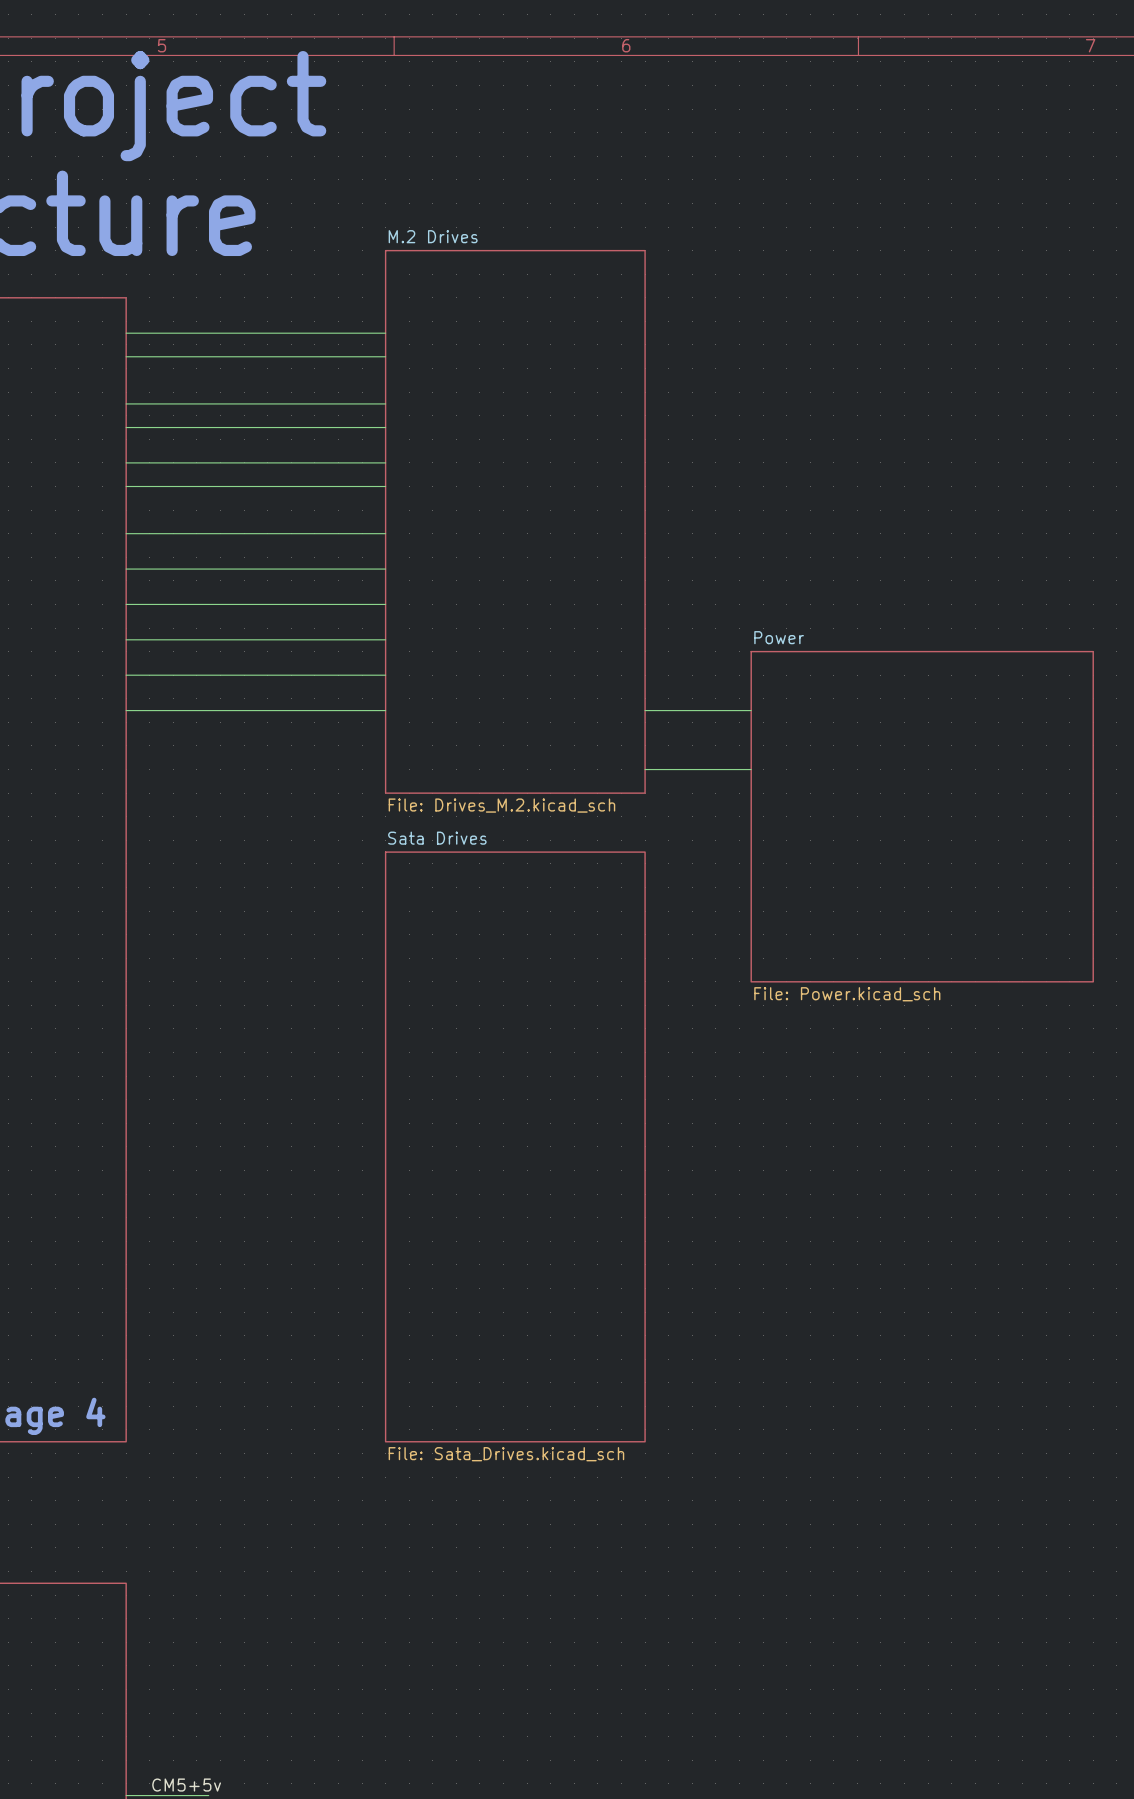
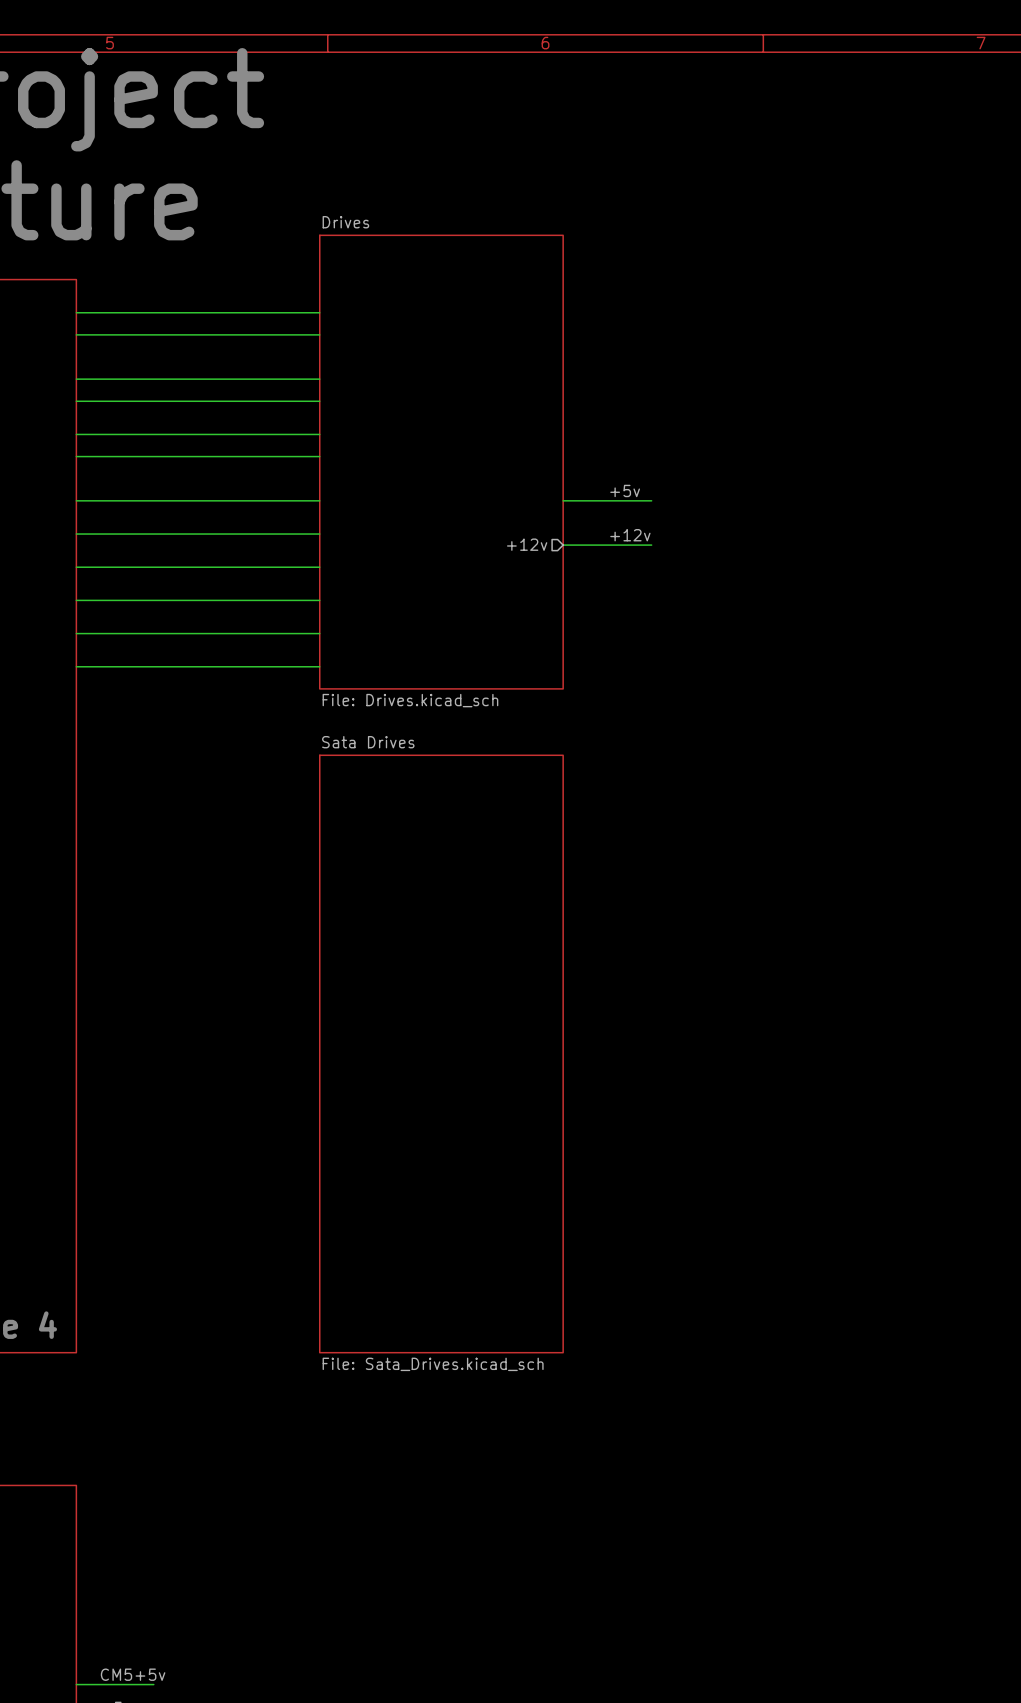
sheet Drives: none -> File: Drives.kicad_sch (441, 462)
sheet M.2 Drives: File: Drives_M.2.kicad_sch (515, 521) -> none
label: none -> +5v (625, 490)
wire: none -> (563, 500) (651, 500)
label: none -> +12v (630, 535)
hierarchical label: none -> +12v (527, 544)
wire: none -> (563, 545) (651, 545)
wire: (645, 710) (751, 710) -> none
wire: (645, 769) (751, 769) -> none
sheet Power: File: Power.kicad_sch (922, 816) -> none
sheet Sata Drives: none -> File: Sata_Drives.kicad_sch (441, 1053)
sheet Sata Drives: File: Sata_Drives.kicad_sch (515, 1146) -> none

